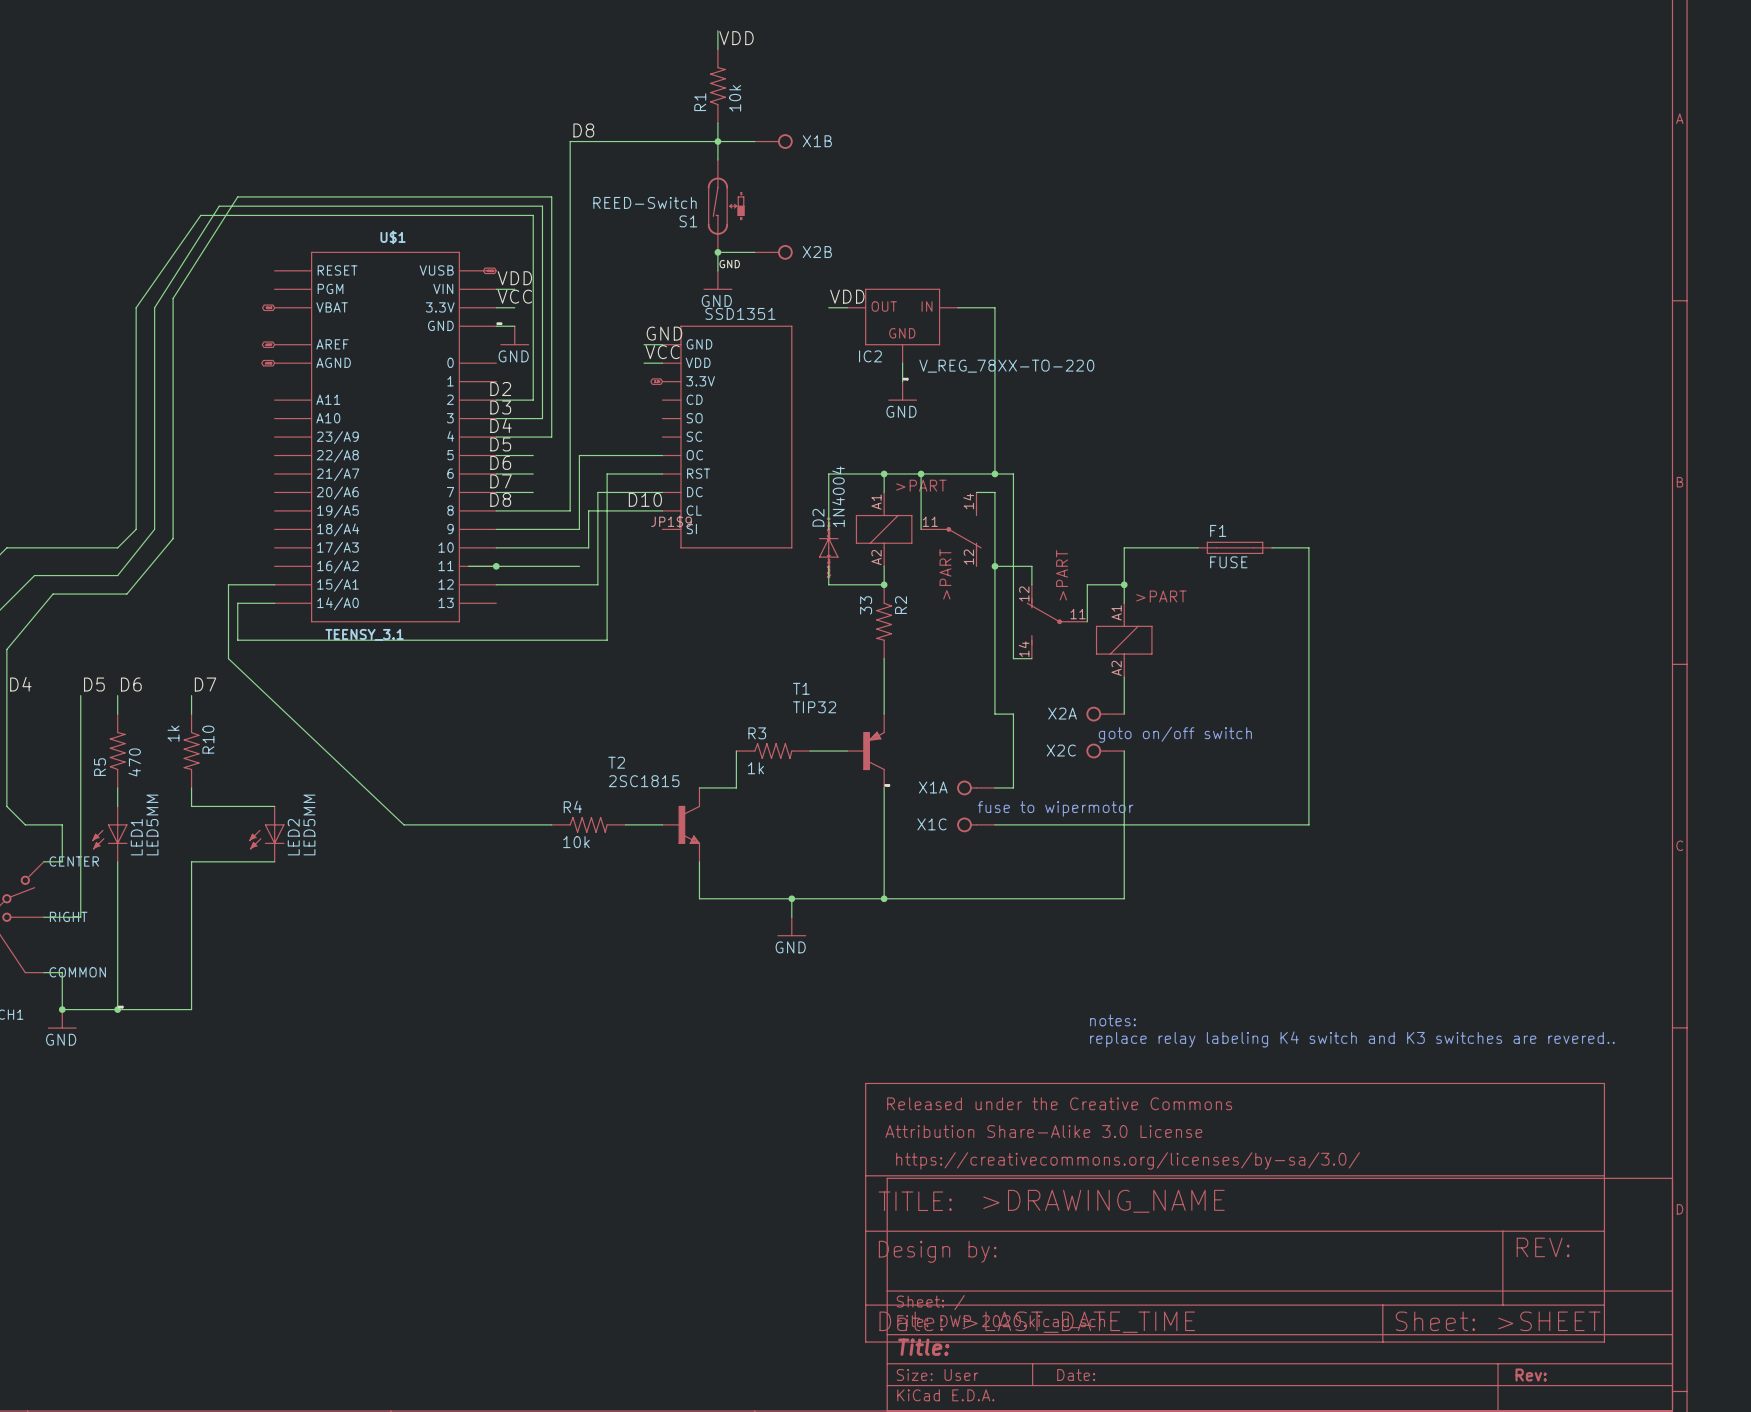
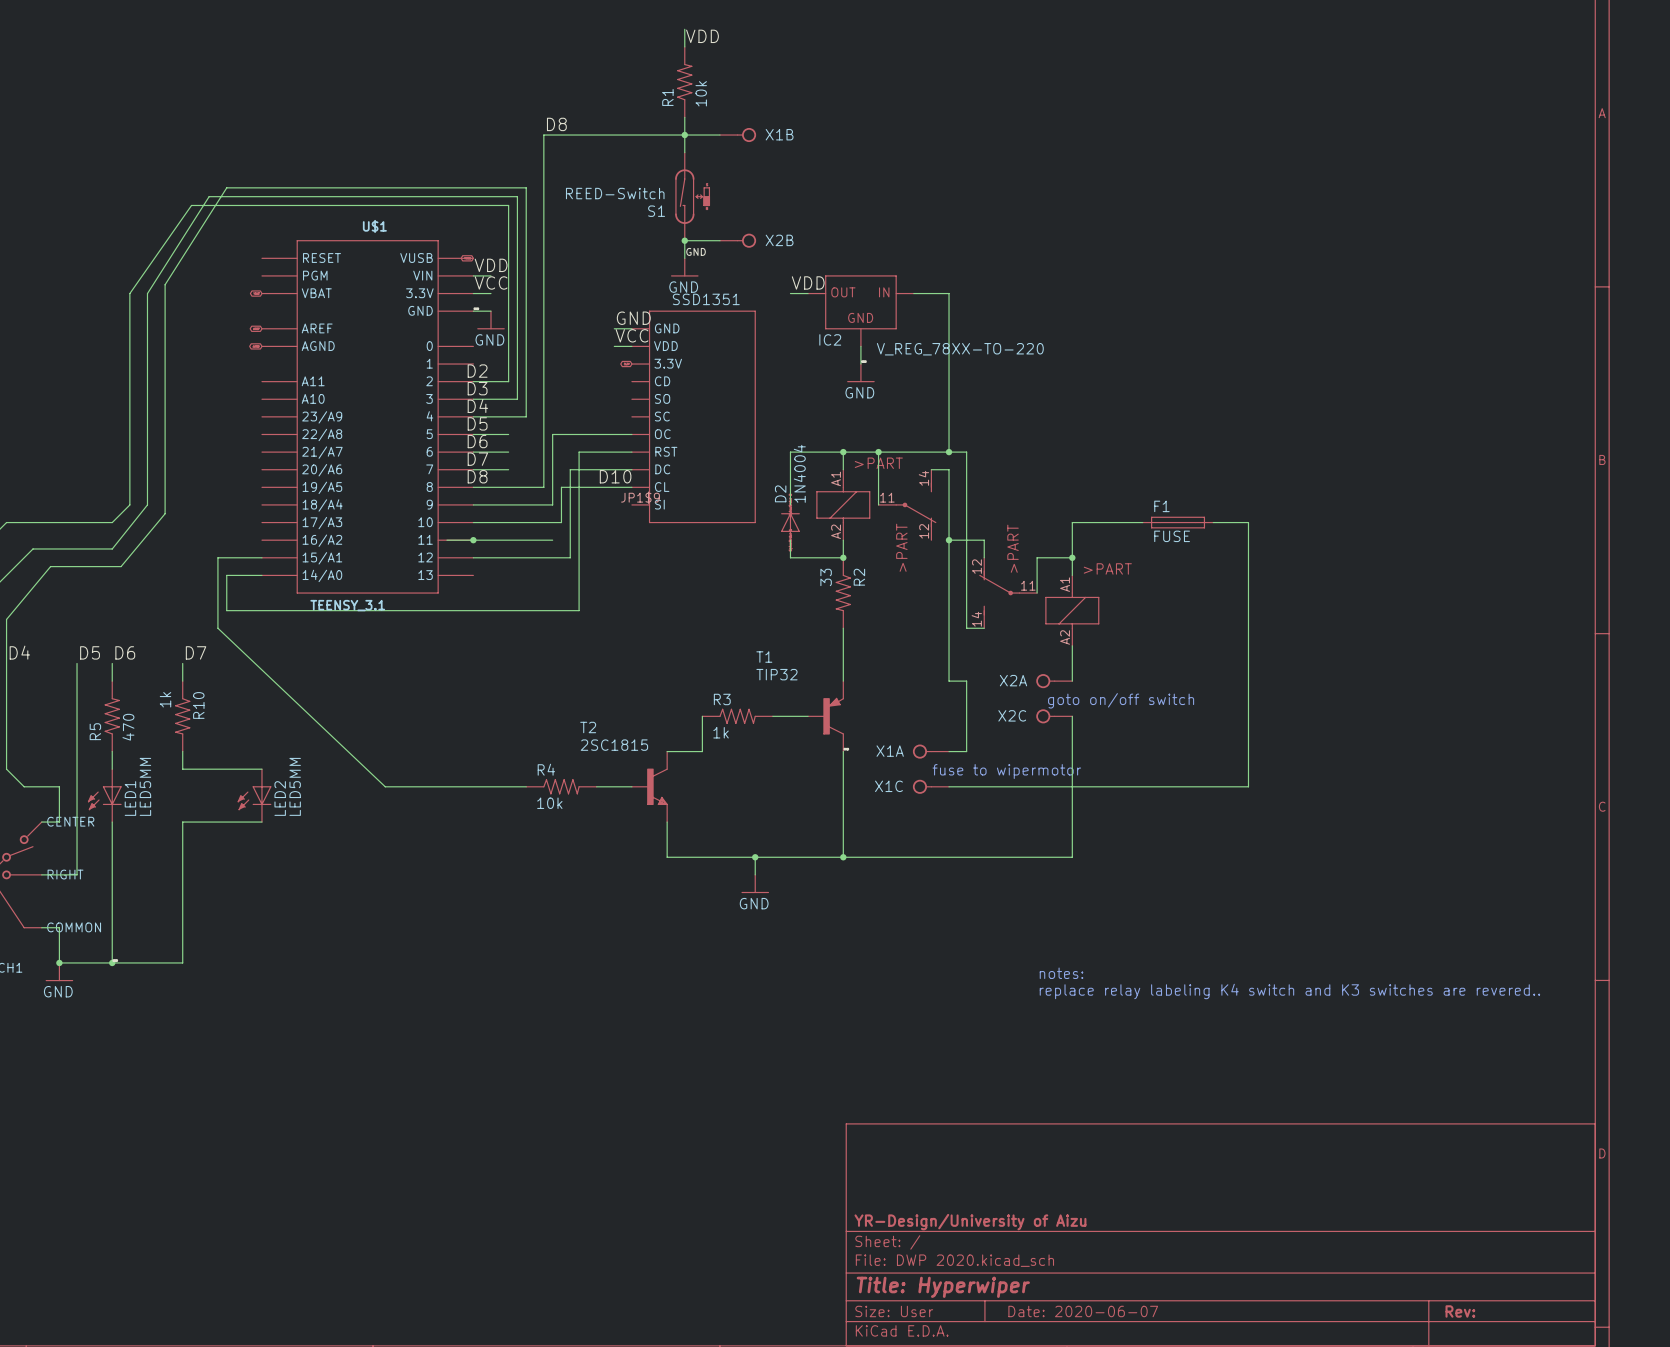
part: (1235, 1212) -> none
title block: none -> YR-Design/University of Aizu (970, 1222)
title block: Title: (923, 1347) -> Title: Hyperwiper (943, 1287)
title block: Date: (1076, 1374) -> Date: 2020-06-07 (1083, 1311)

